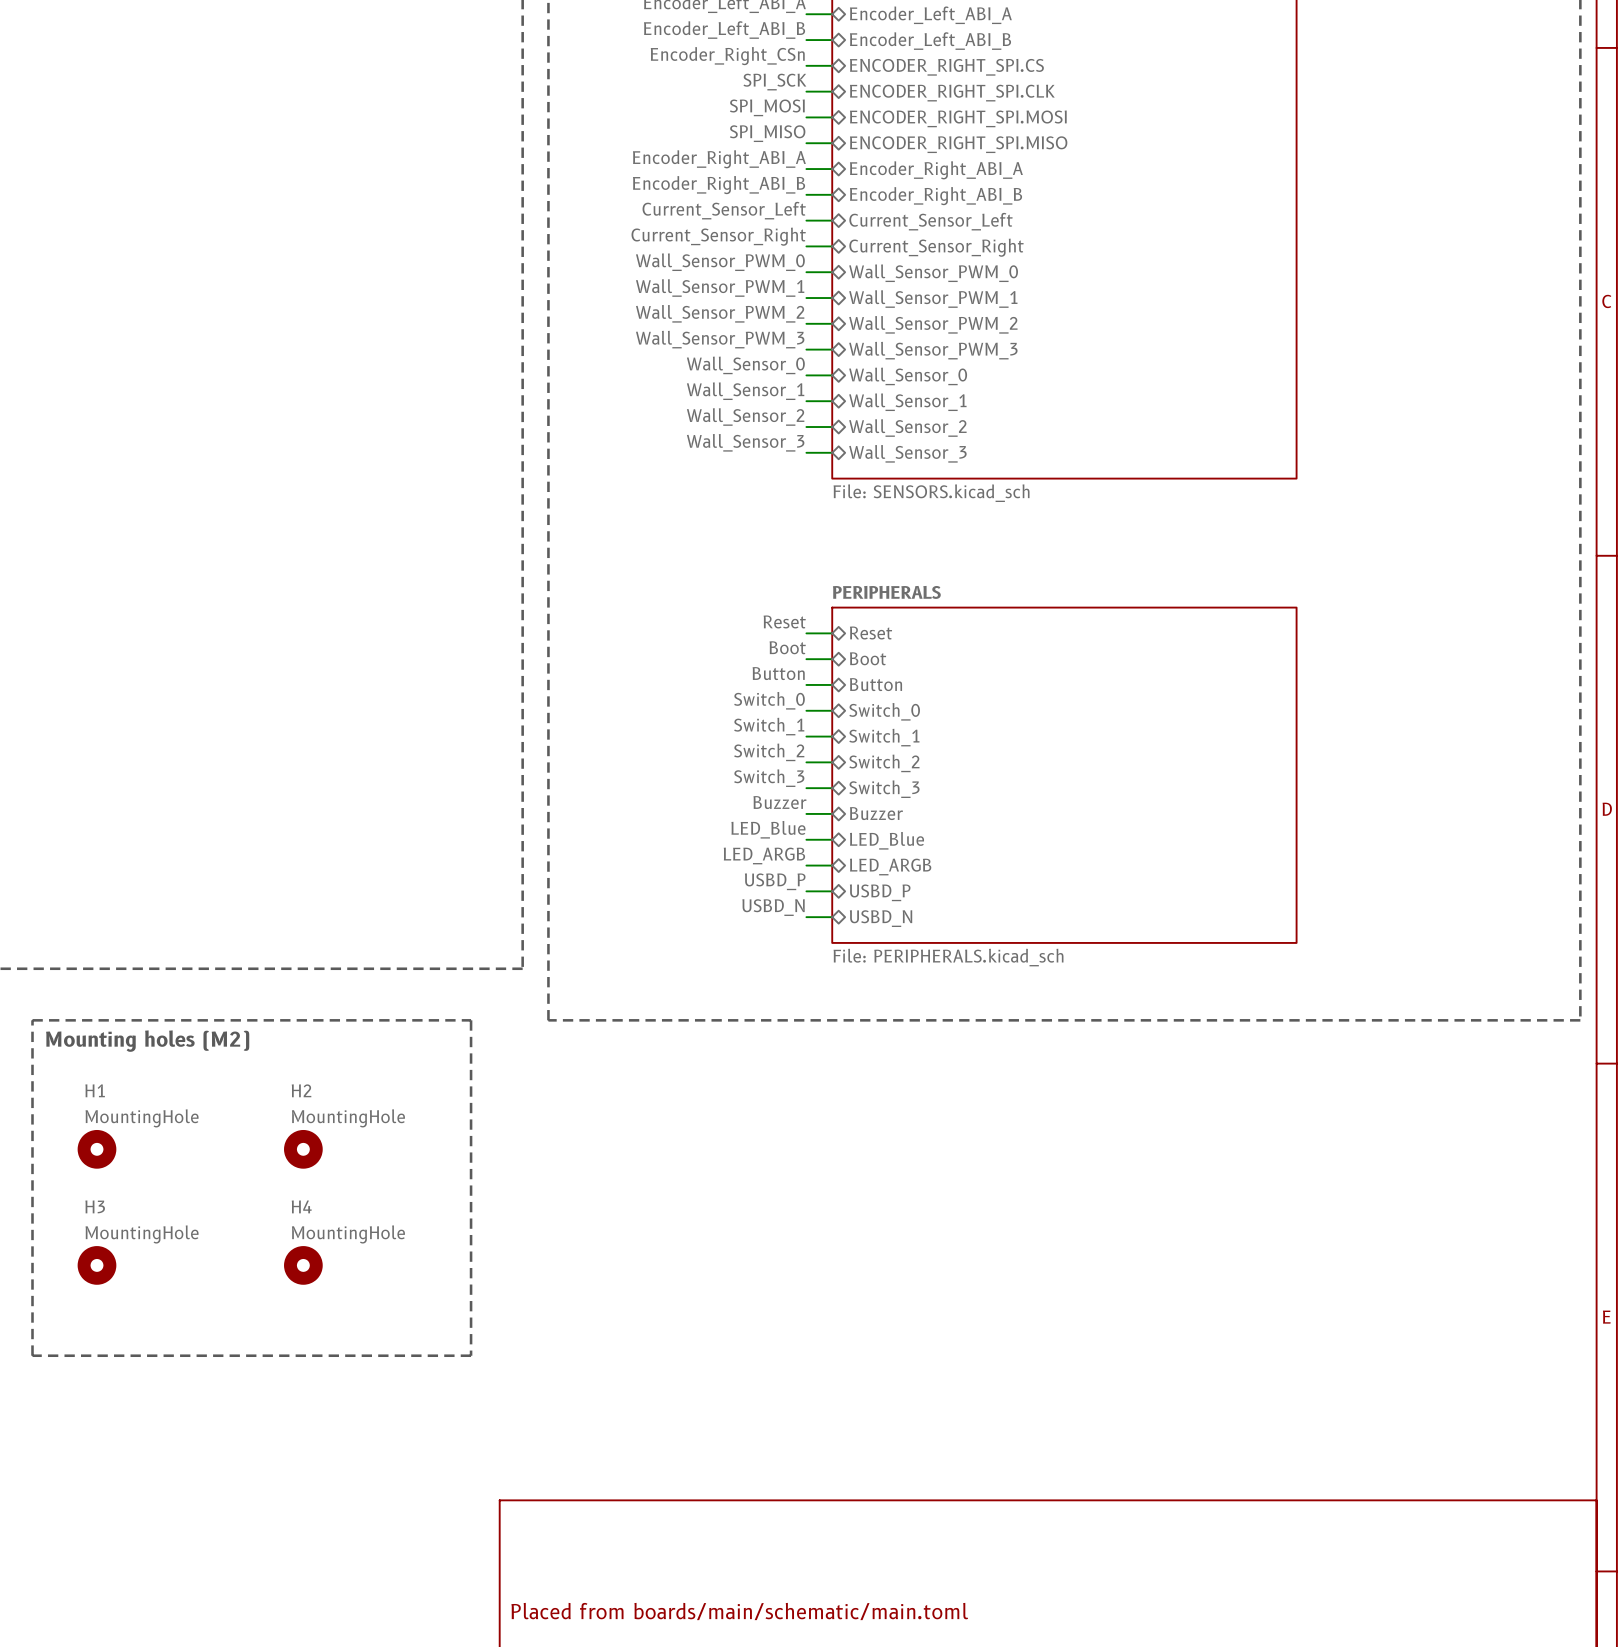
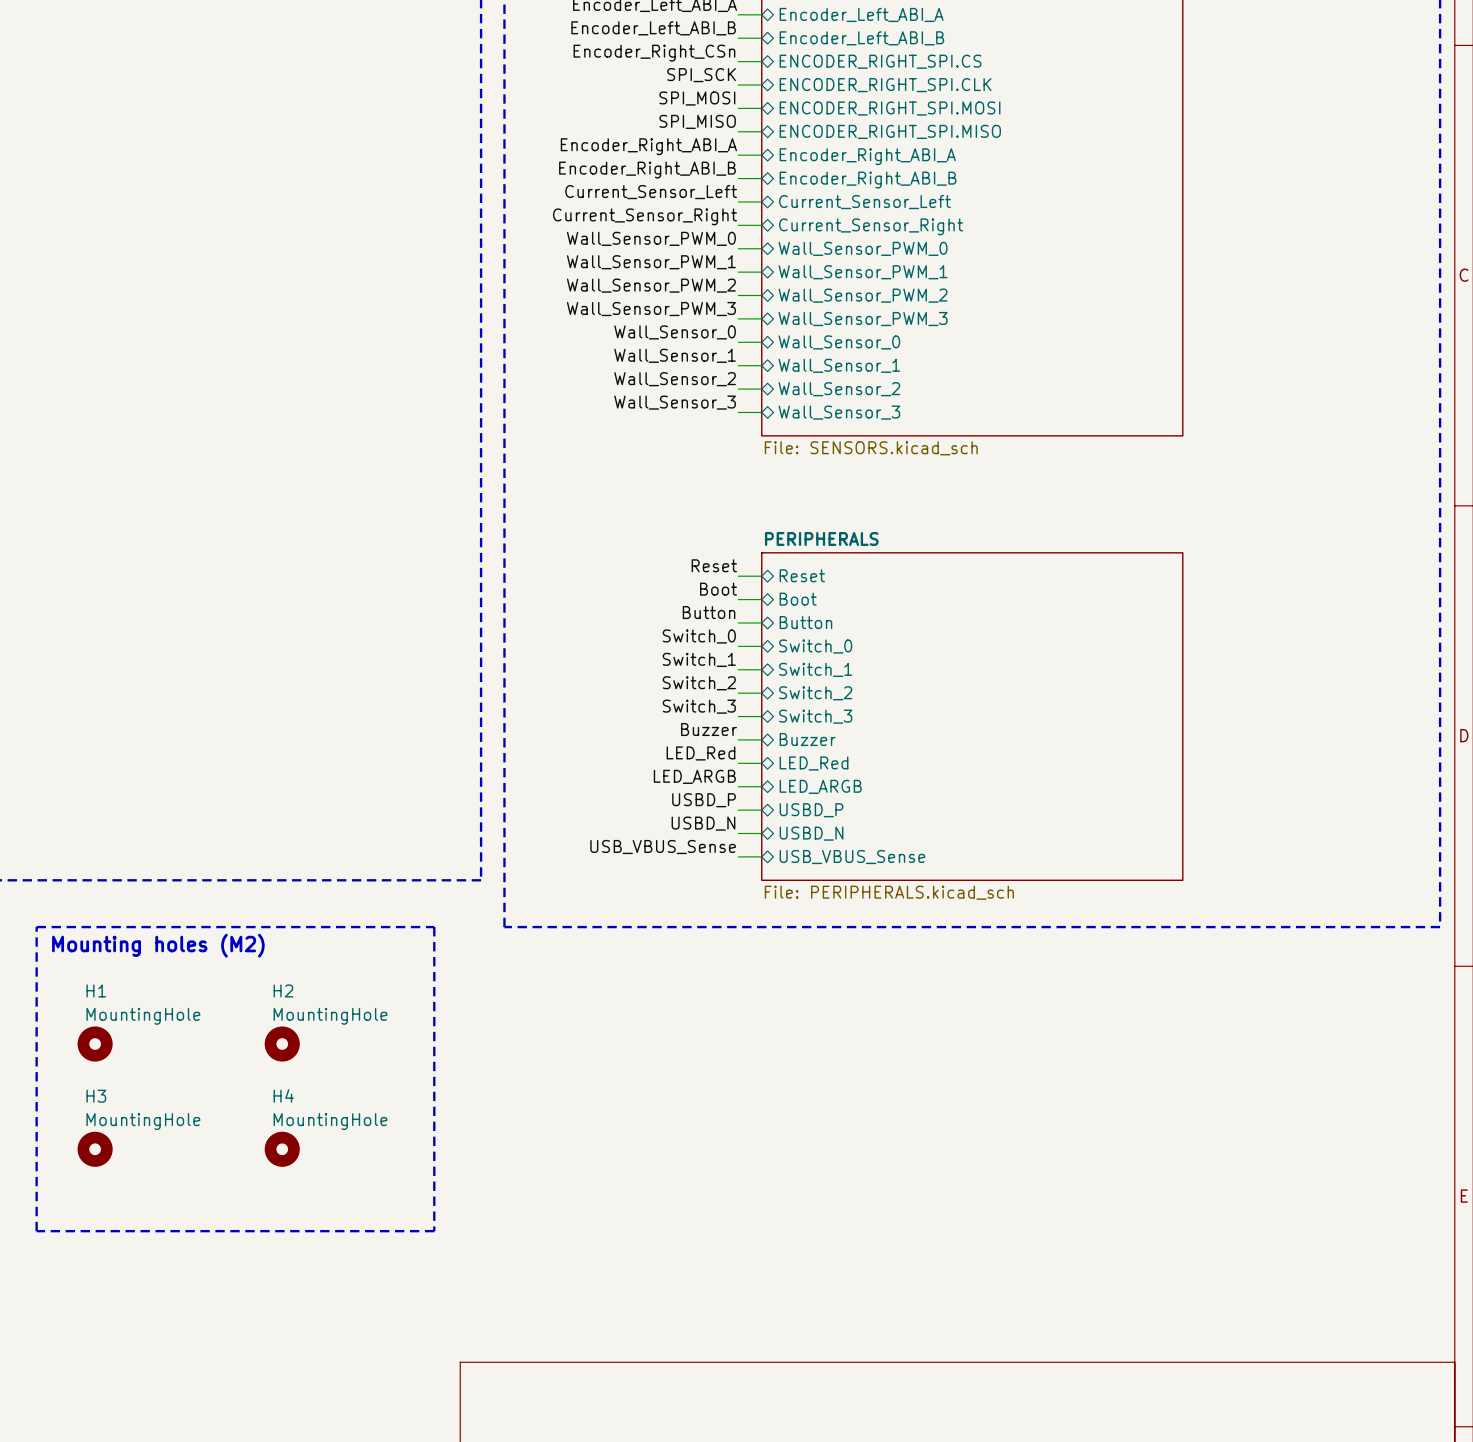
sheet PERIPHERALS: File: PERIPHERALS.kicad_sch (1064, 775) -> none
sheet PERIPHERALS: none -> File: PERIPHERALS.kicad_sch (972, 716)
label: LED_Blue (768, 829) -> LED_Red (700, 753)
sheet pin: LED_Blue (887, 840) -> LED_Red (814, 763)
label: none -> USB_VBUS_Sense (663, 847)
wire: none -> (738, 856) (761, 856)
sheet pin: none -> USB_VBUS_Sense (852, 857)

